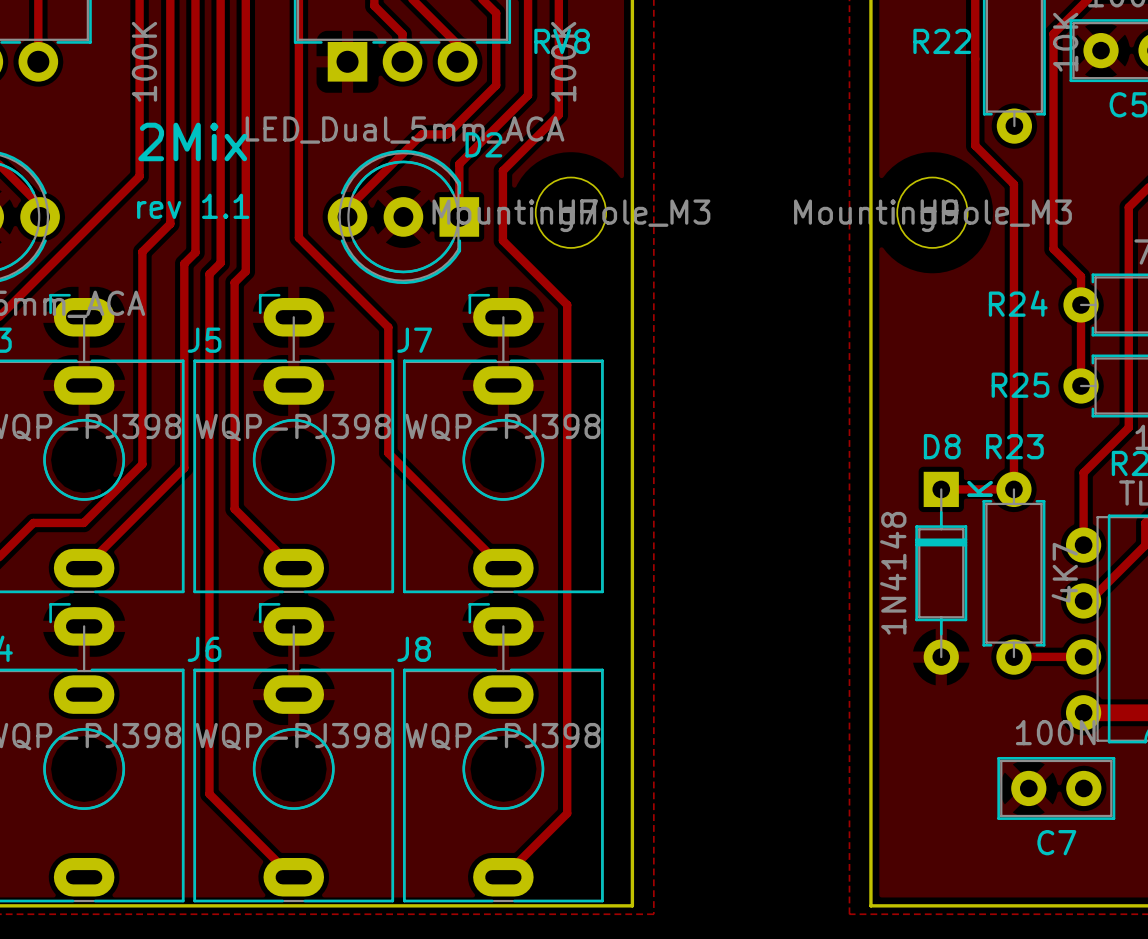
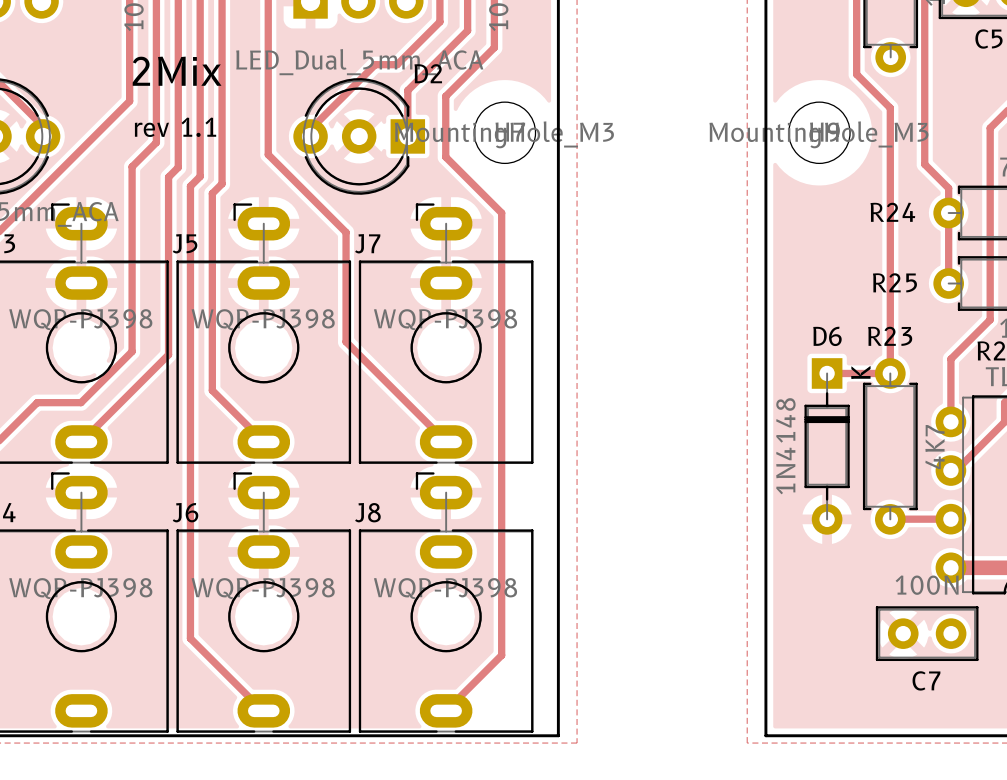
D8 name: D8 (942, 446) -> D6 (827, 336)

